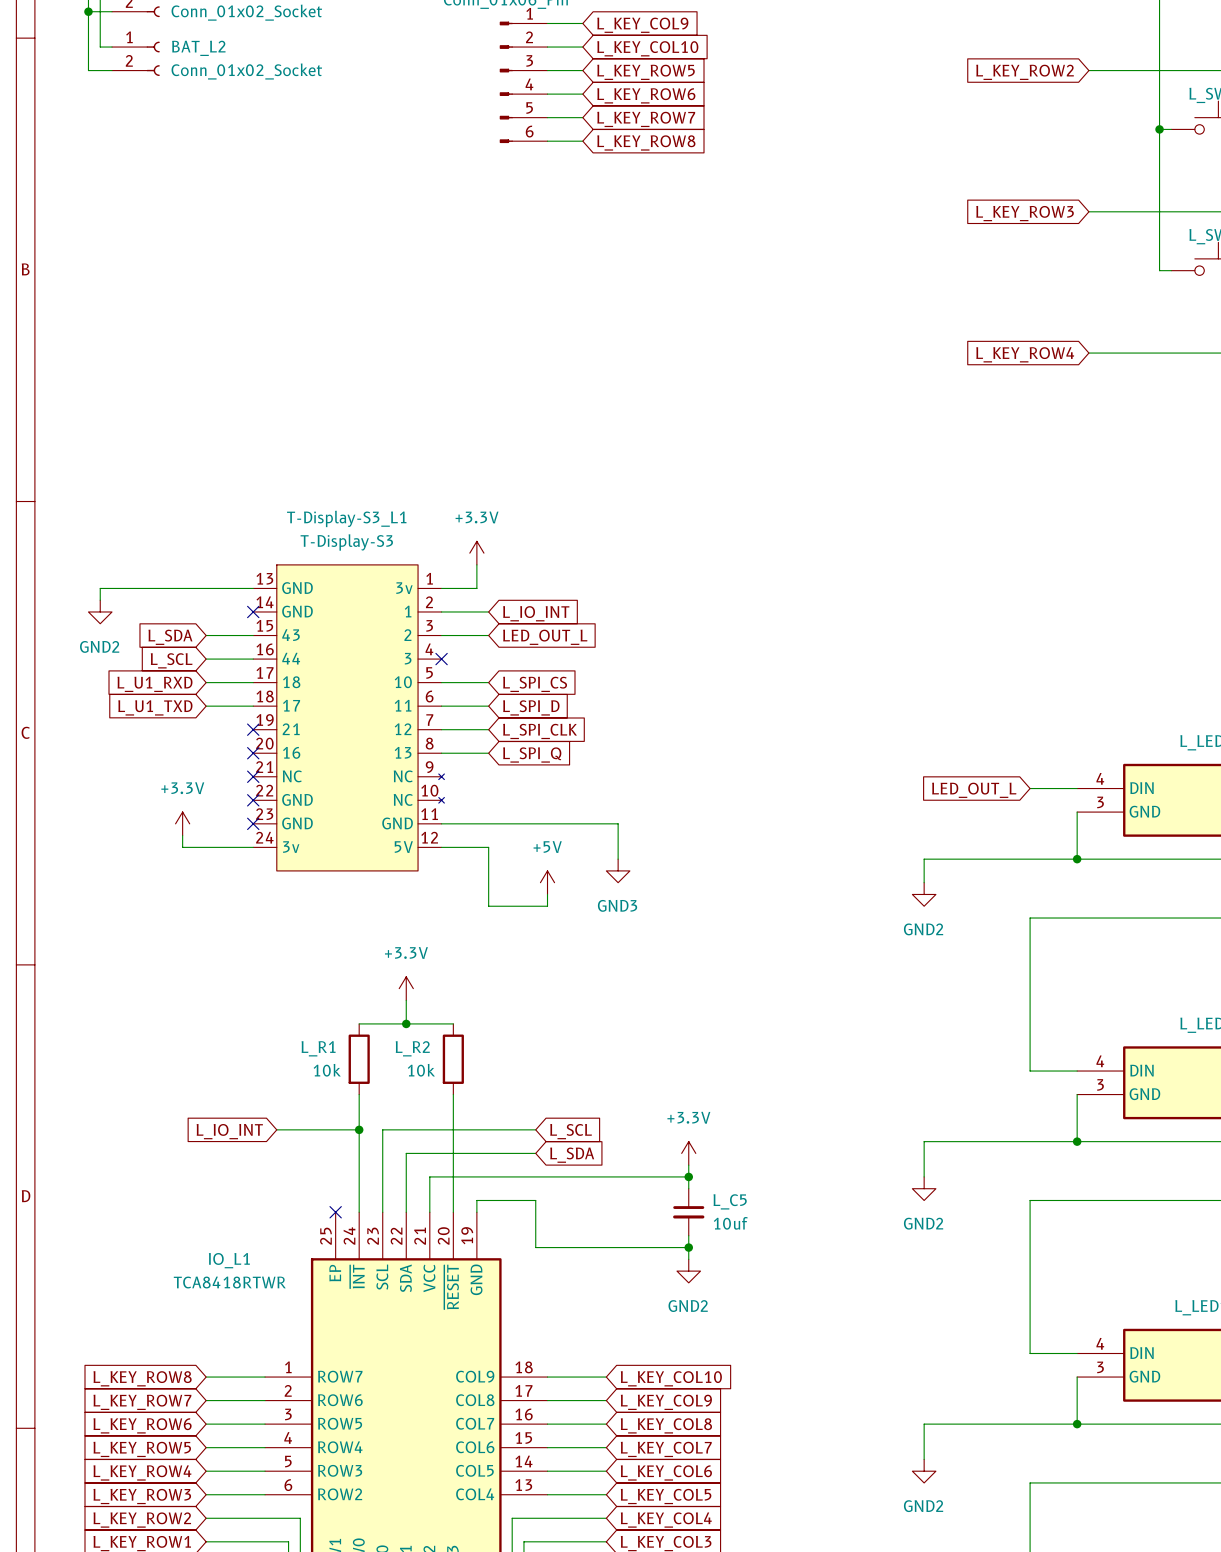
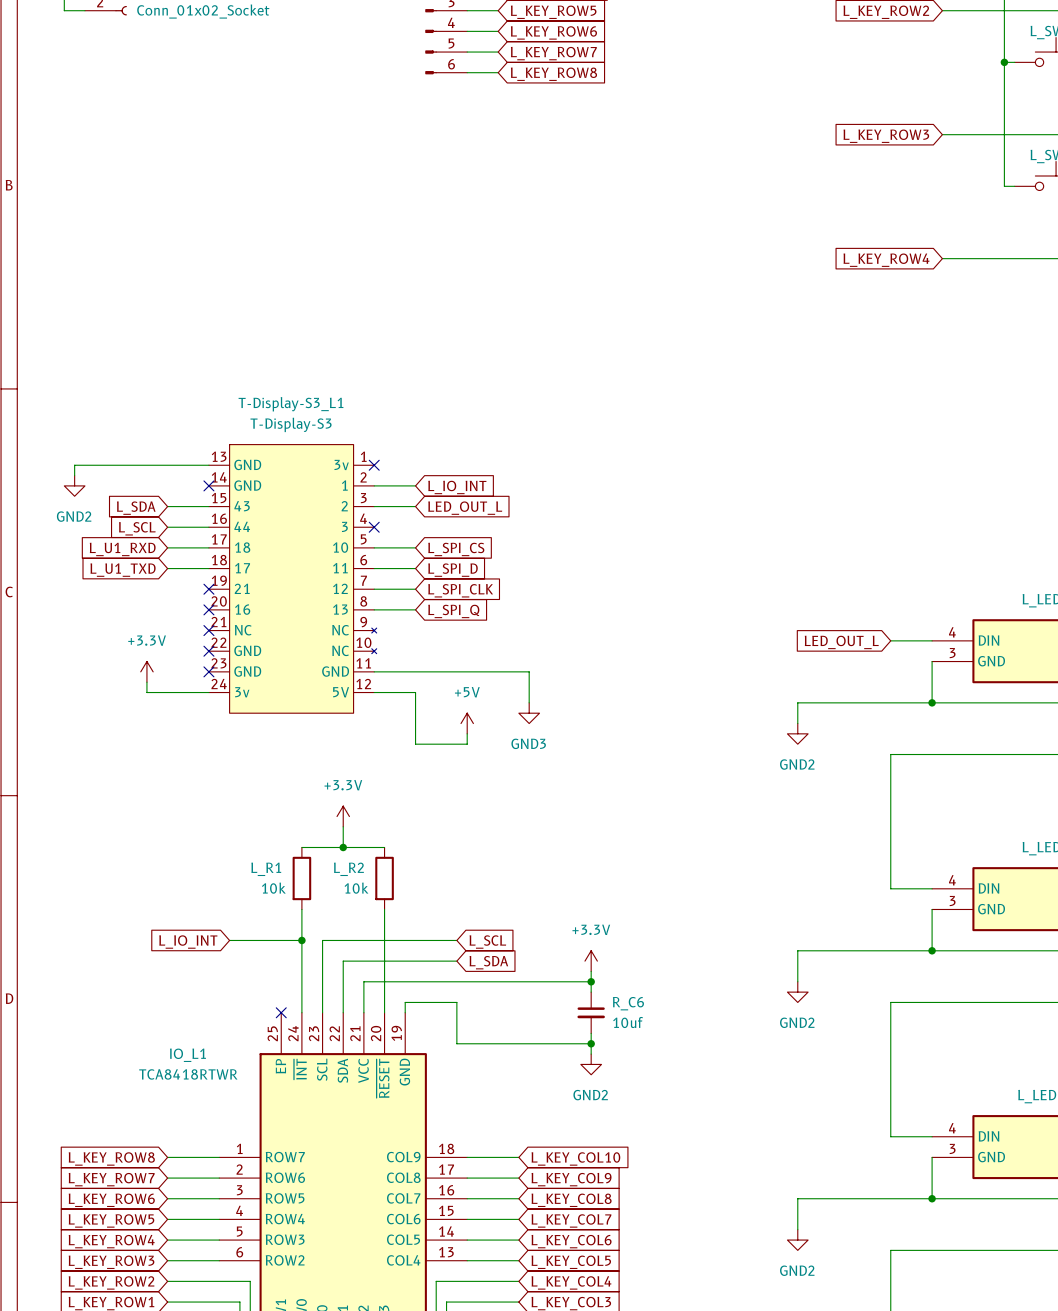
power symbol: +3.3V (476, 553) -> none
wire: (476, 564) (476, 588) (441, 588) -> none
no-connect mark: none -> (374, 465)
L_C5 name: L_C5 (730, 1201) -> R_C6 (628, 1003)

